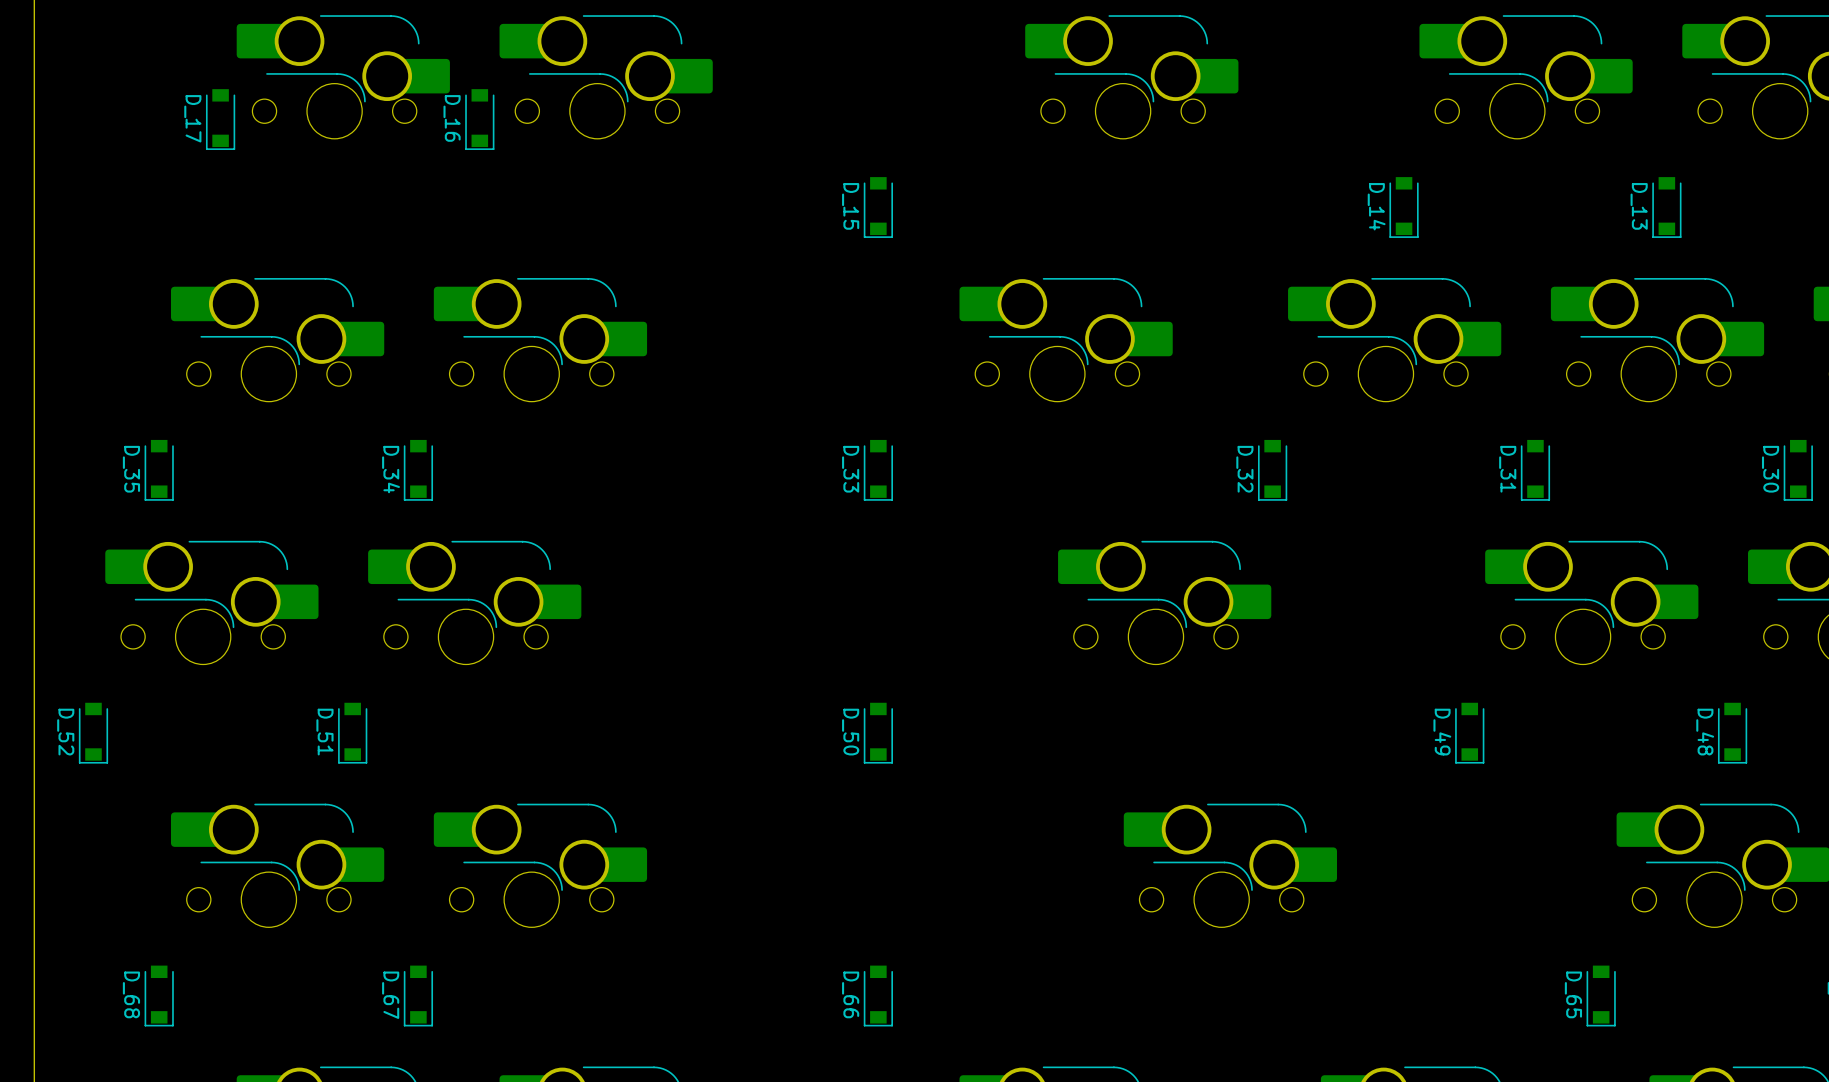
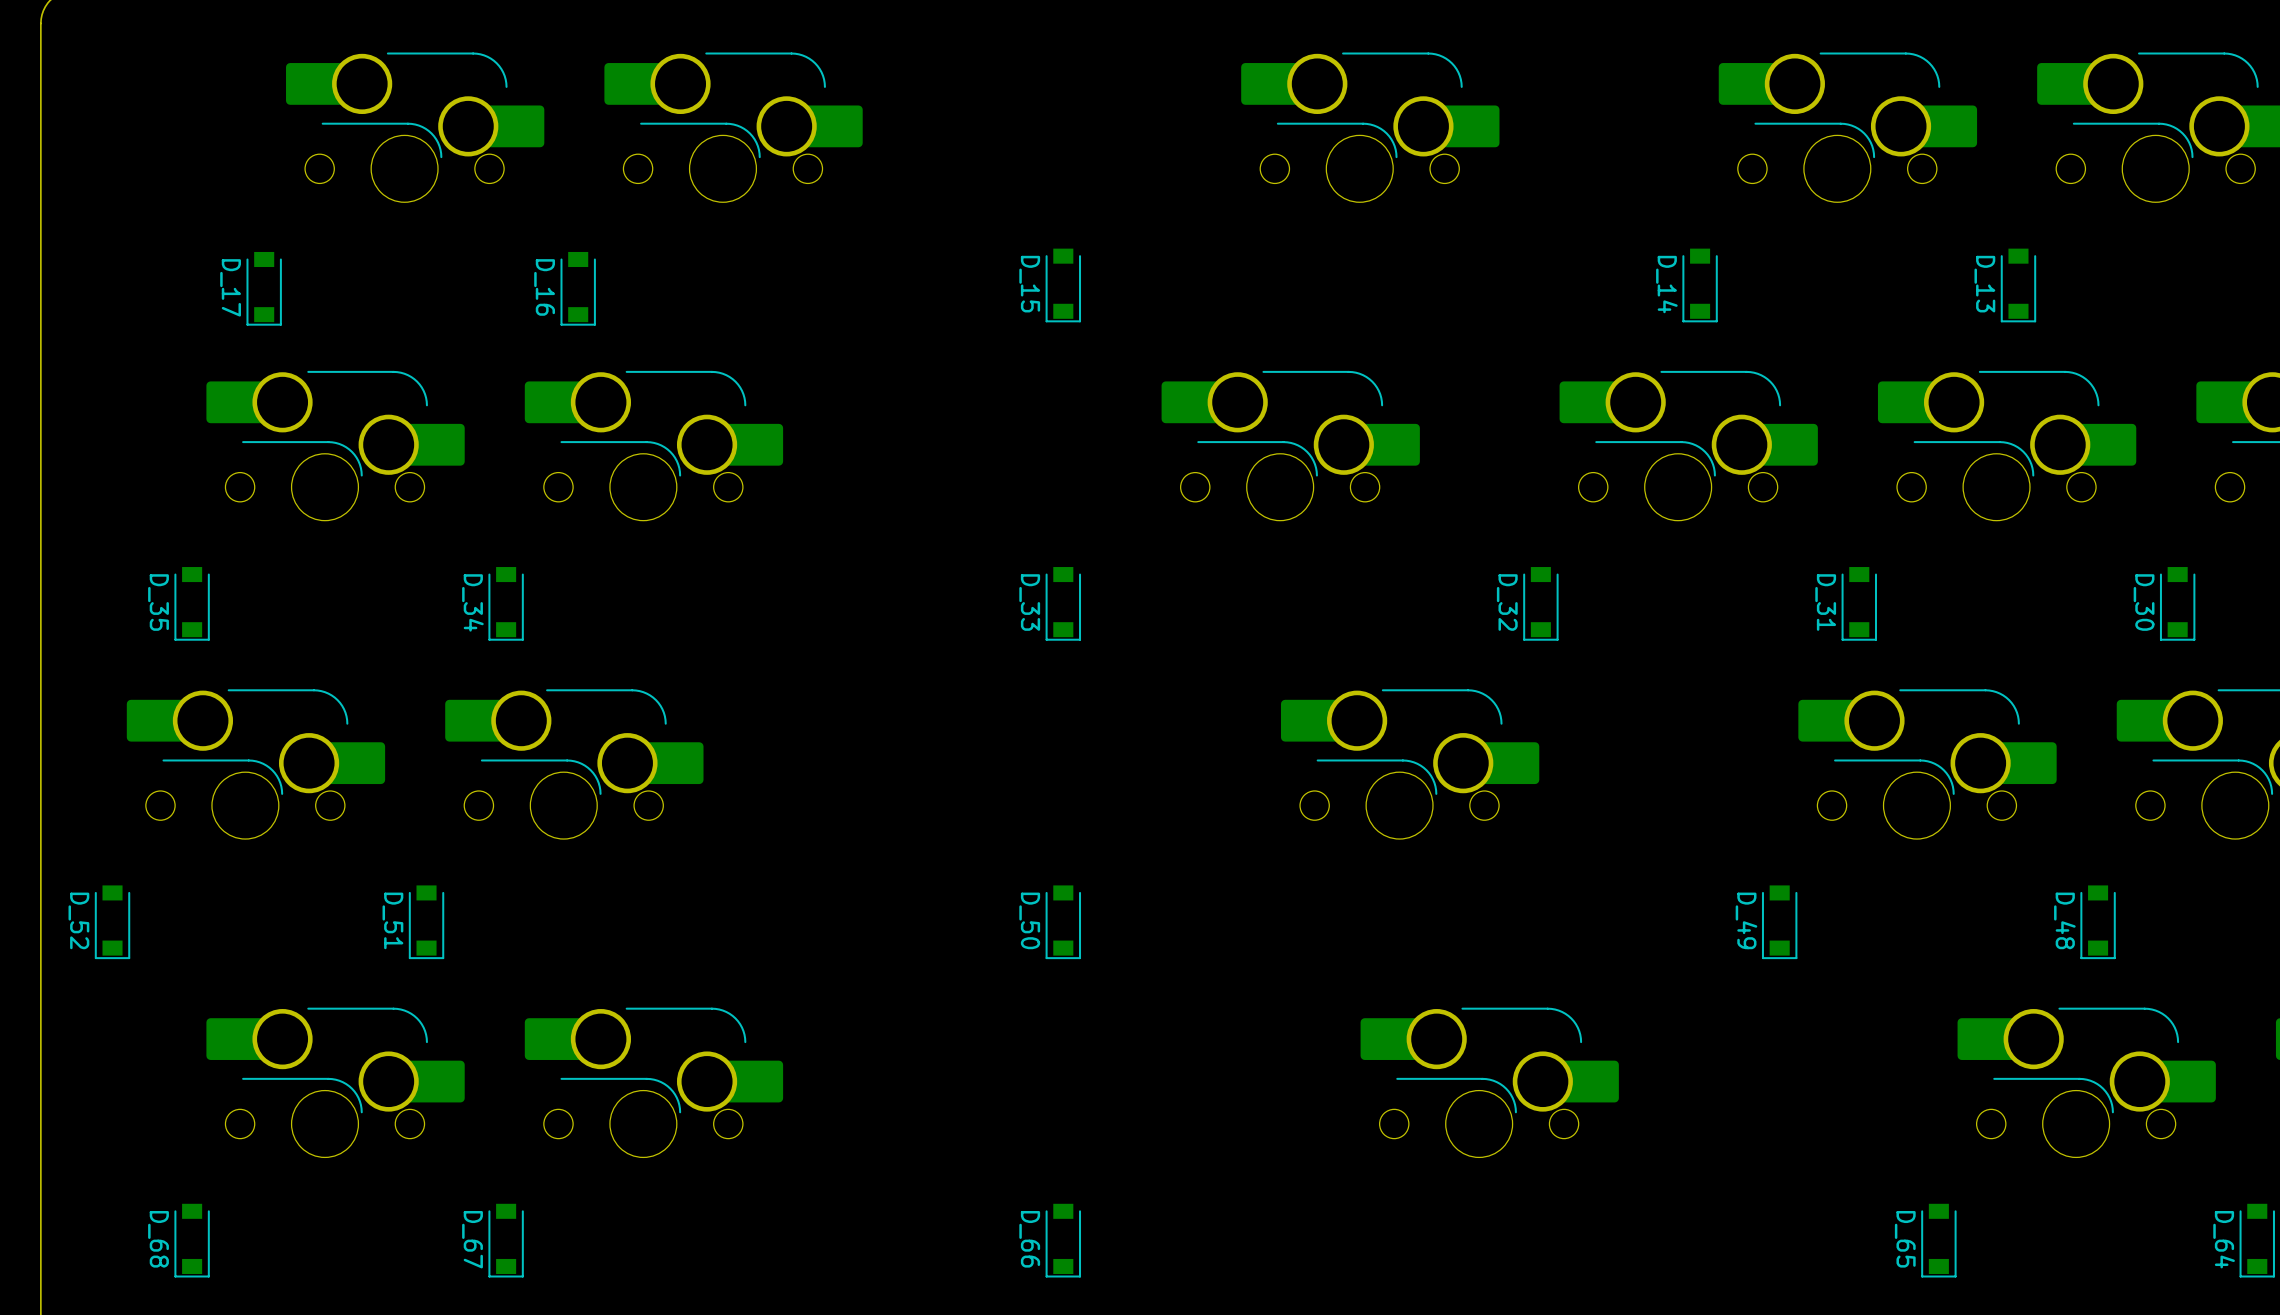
D_17 position: (220, 119) -> (264, 288)
D_16 position: (479, 119) -> (578, 288)

